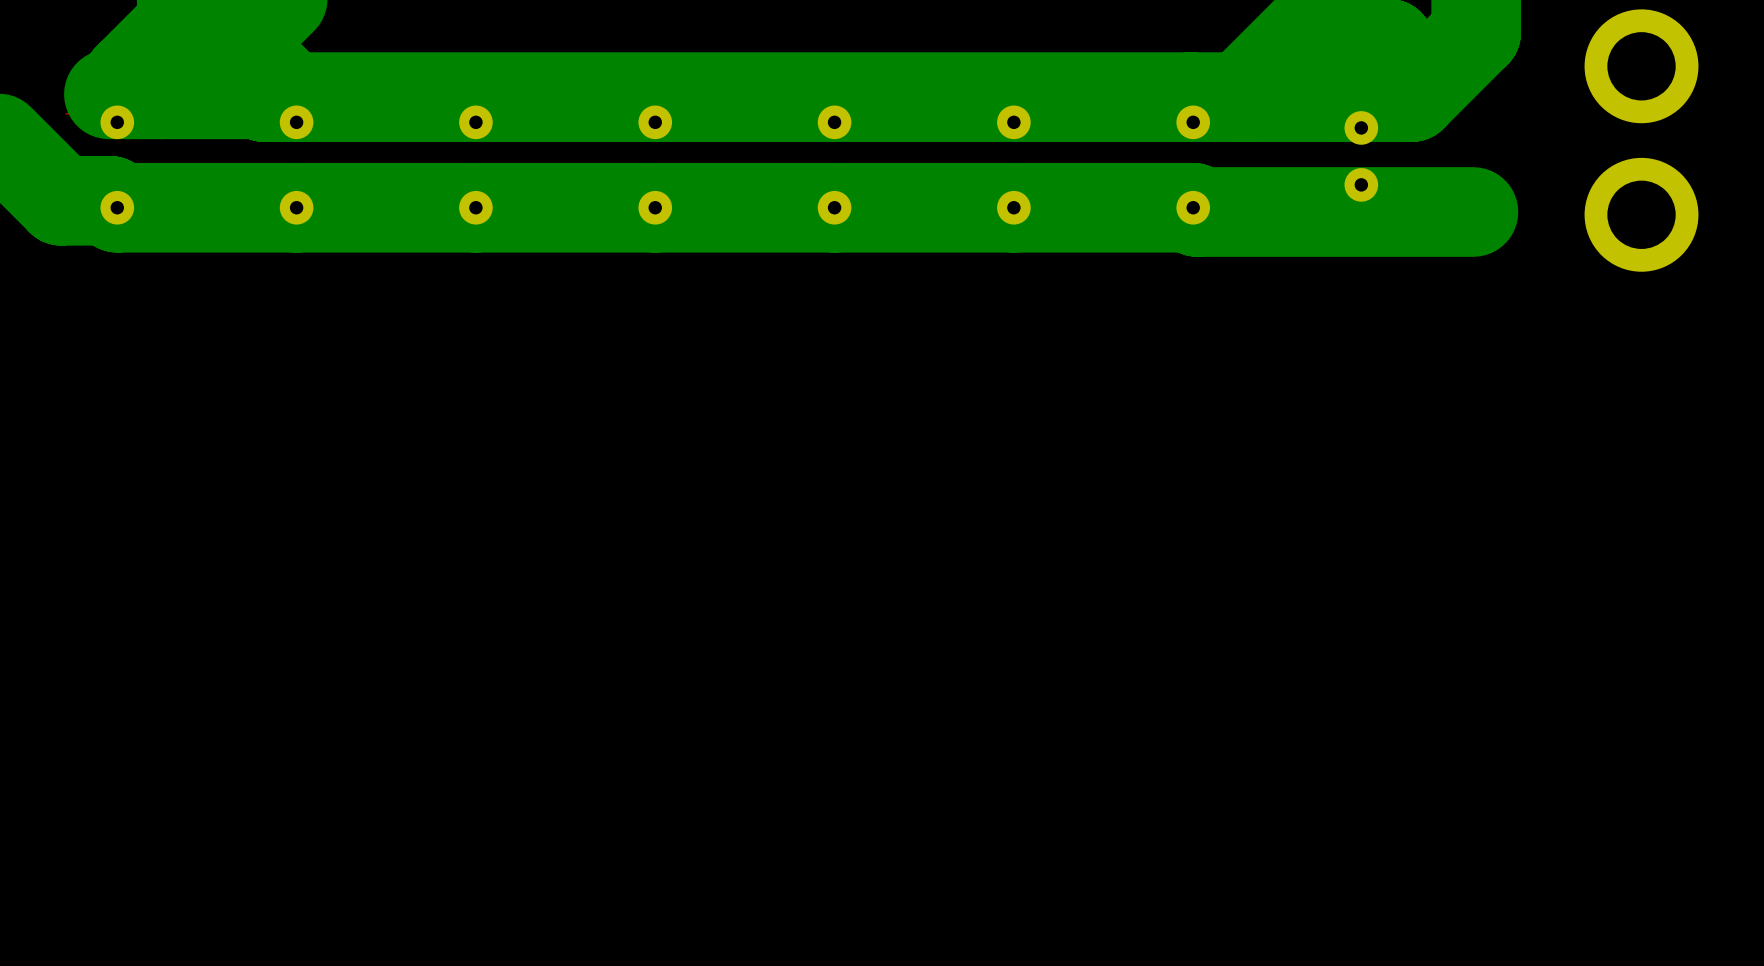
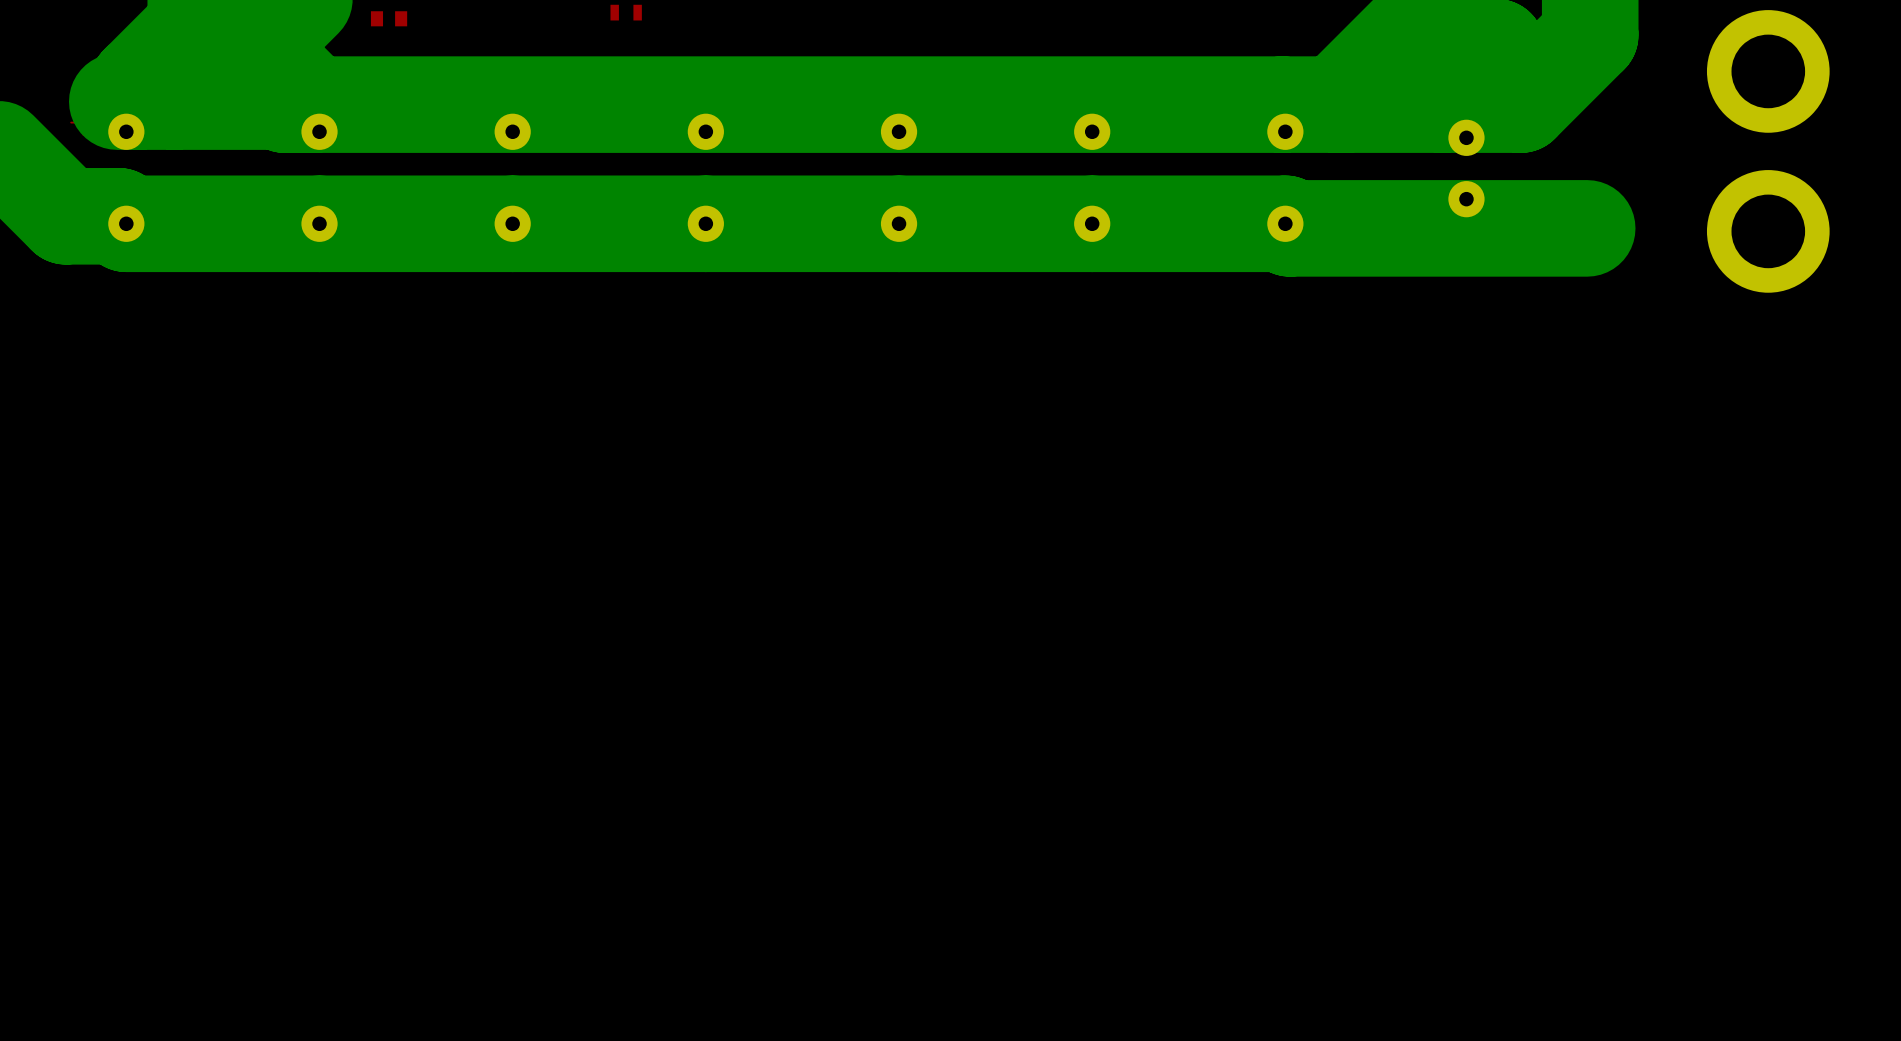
part: none -> (626, 12)
part: none -> (389, 18)

